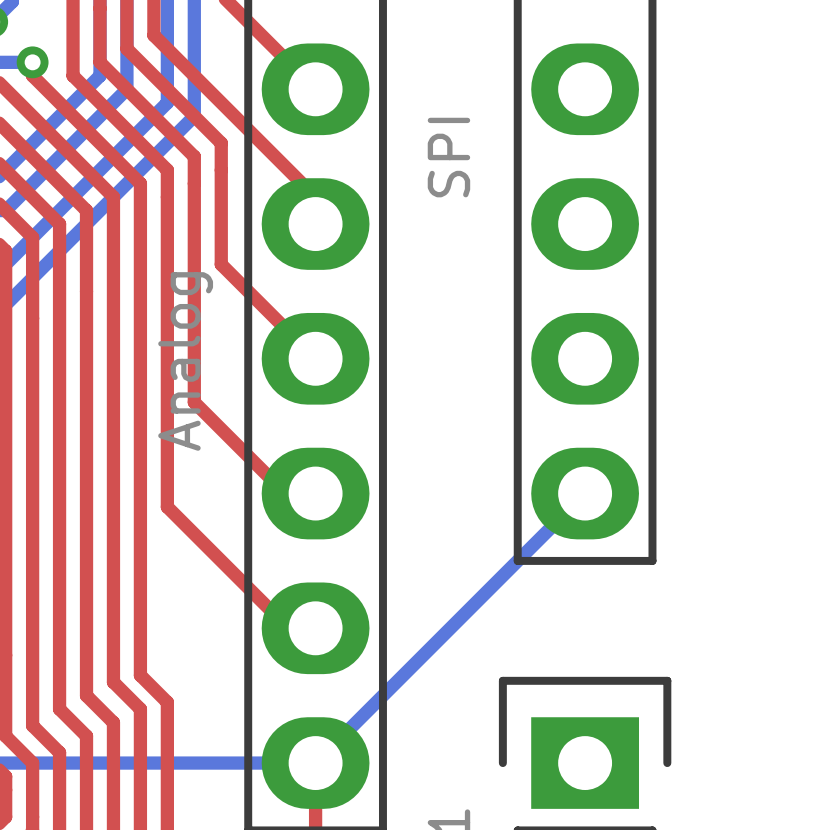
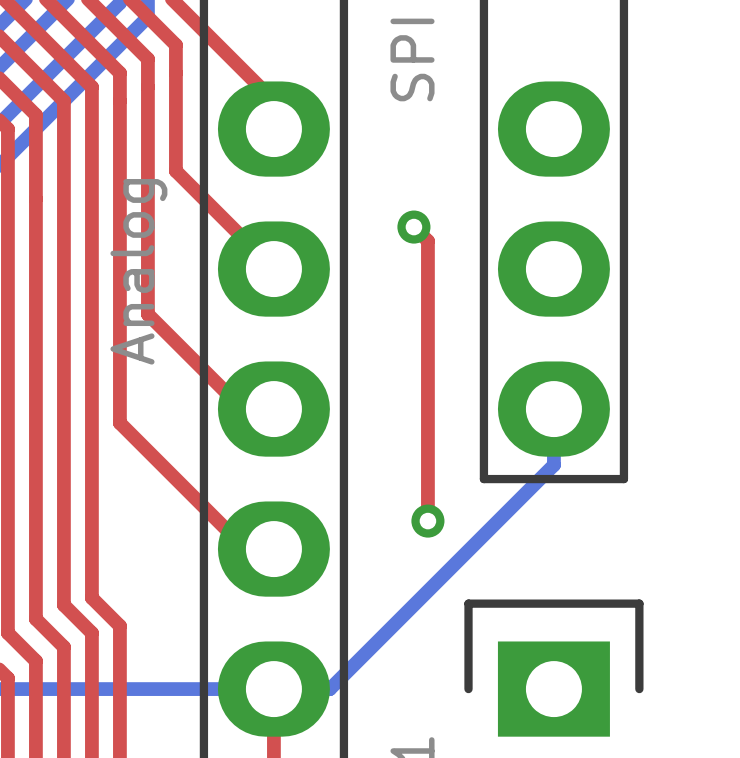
top track: none -> (413, 227) (427, 241) (427, 521)
via: none -> (413, 227)
bottom track: (585, 493) (315, 763) -> (553, 409) (553, 465) (329, 689) (273, 689)
via: none -> (427, 521)

